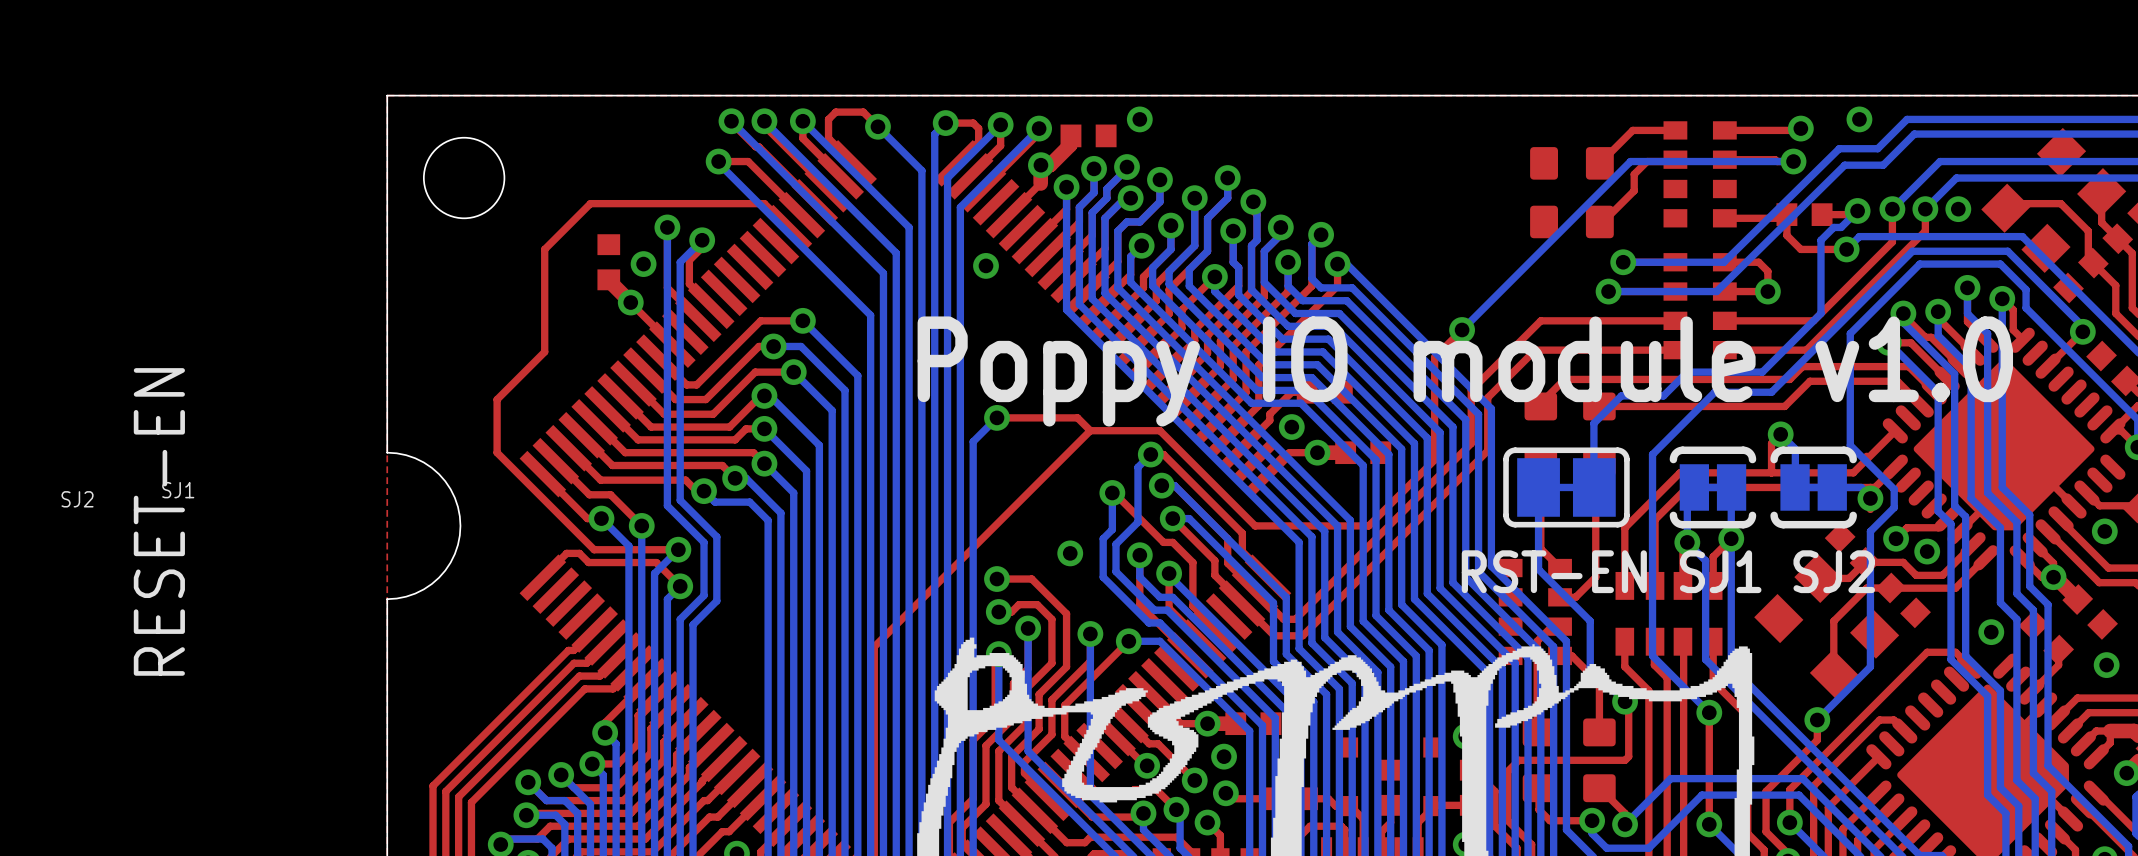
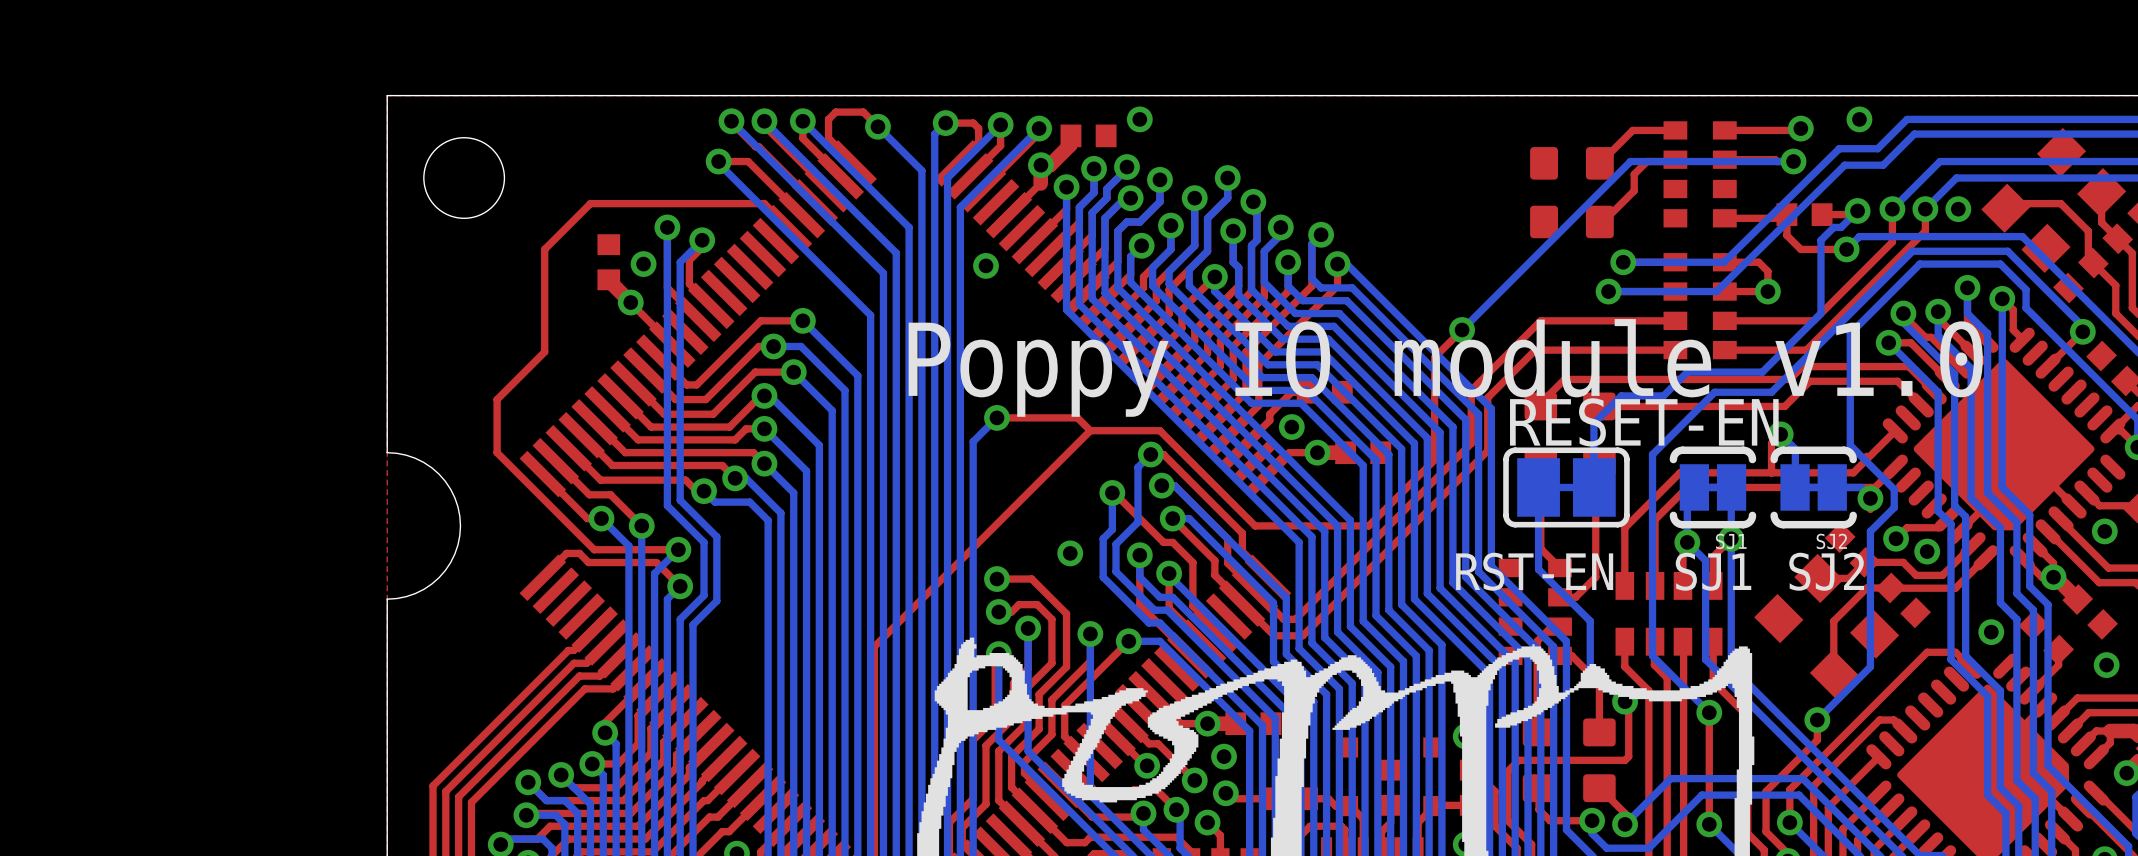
SJ1 name position: SJ1 (178, 490) -> SJ1 (1731, 541)
SJ2 name position: SJ2 (77, 499) -> SJ2 (1831, 541)
RESET-EN name rotation: 0° (159, 521) -> 90° clockwise (1644, 422)
RESET-EN name position: RESET-EN (159, 521) -> RESET-EN (1644, 422)

